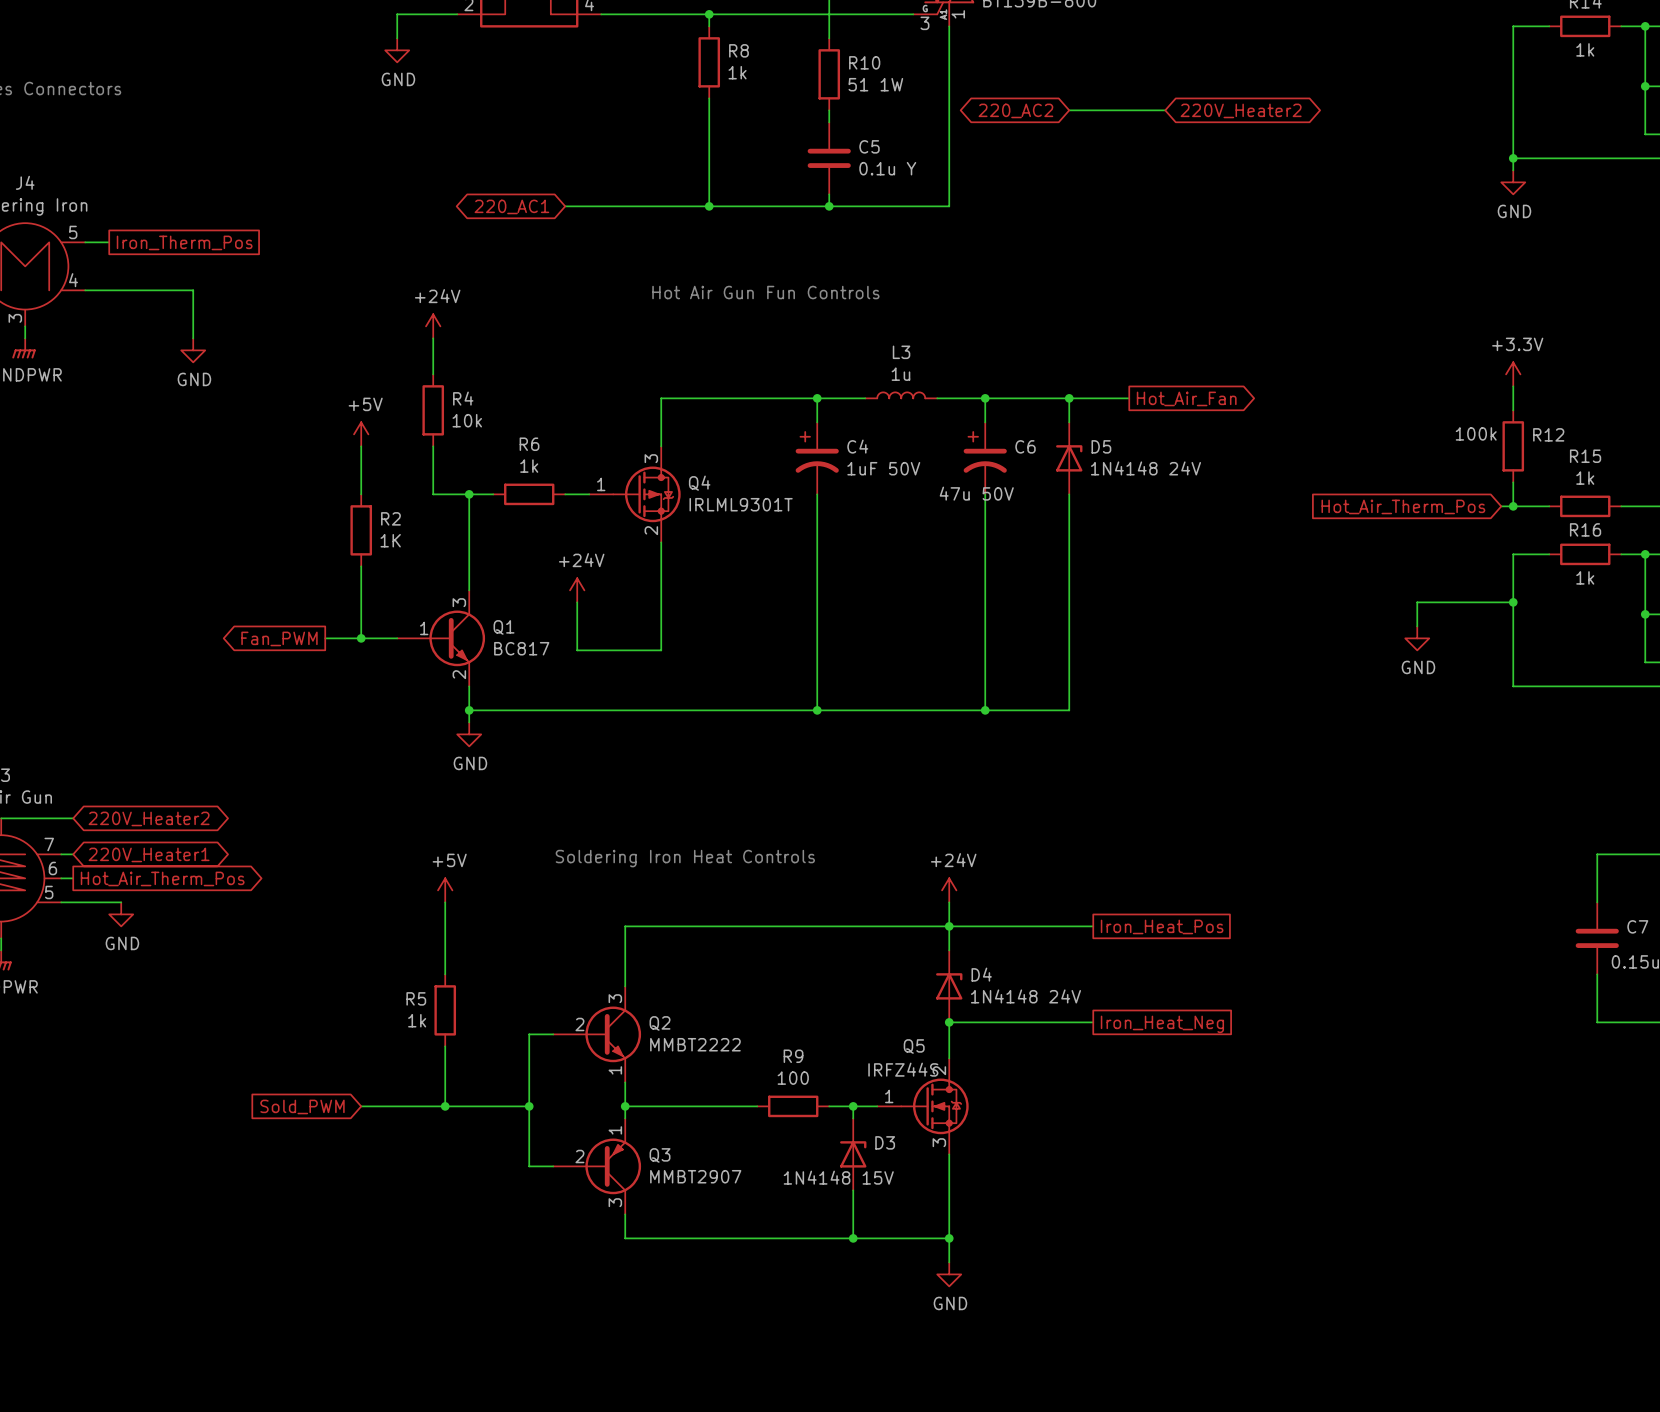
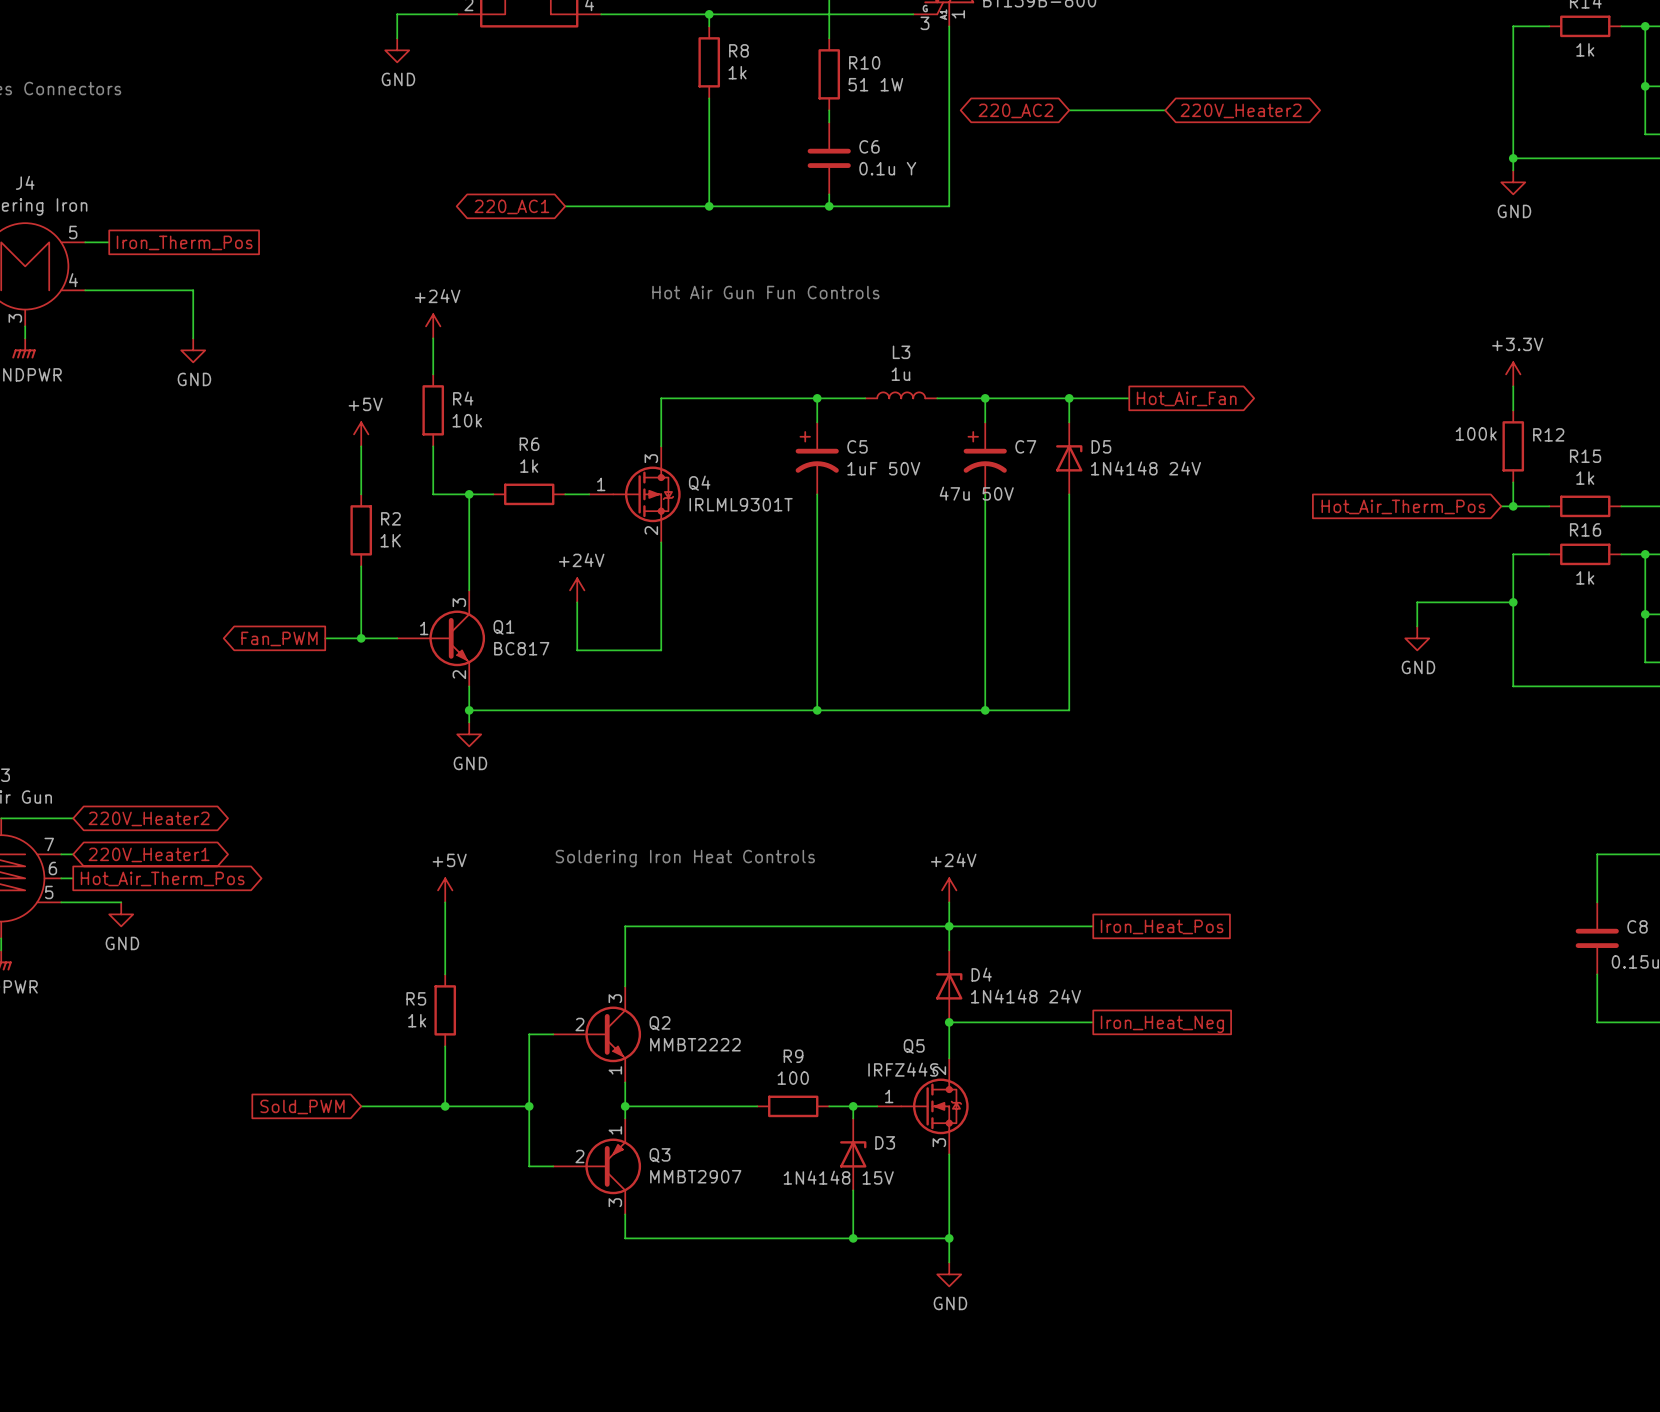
C5 name: C5 (869, 146) -> C6 (869, 146)
C4 name: C4 (857, 446) -> C5 (857, 446)
C6 name: C6 (1025, 446) -> C7 (1025, 446)
C7 name: C7 (1637, 926) -> C8 (1637, 926)

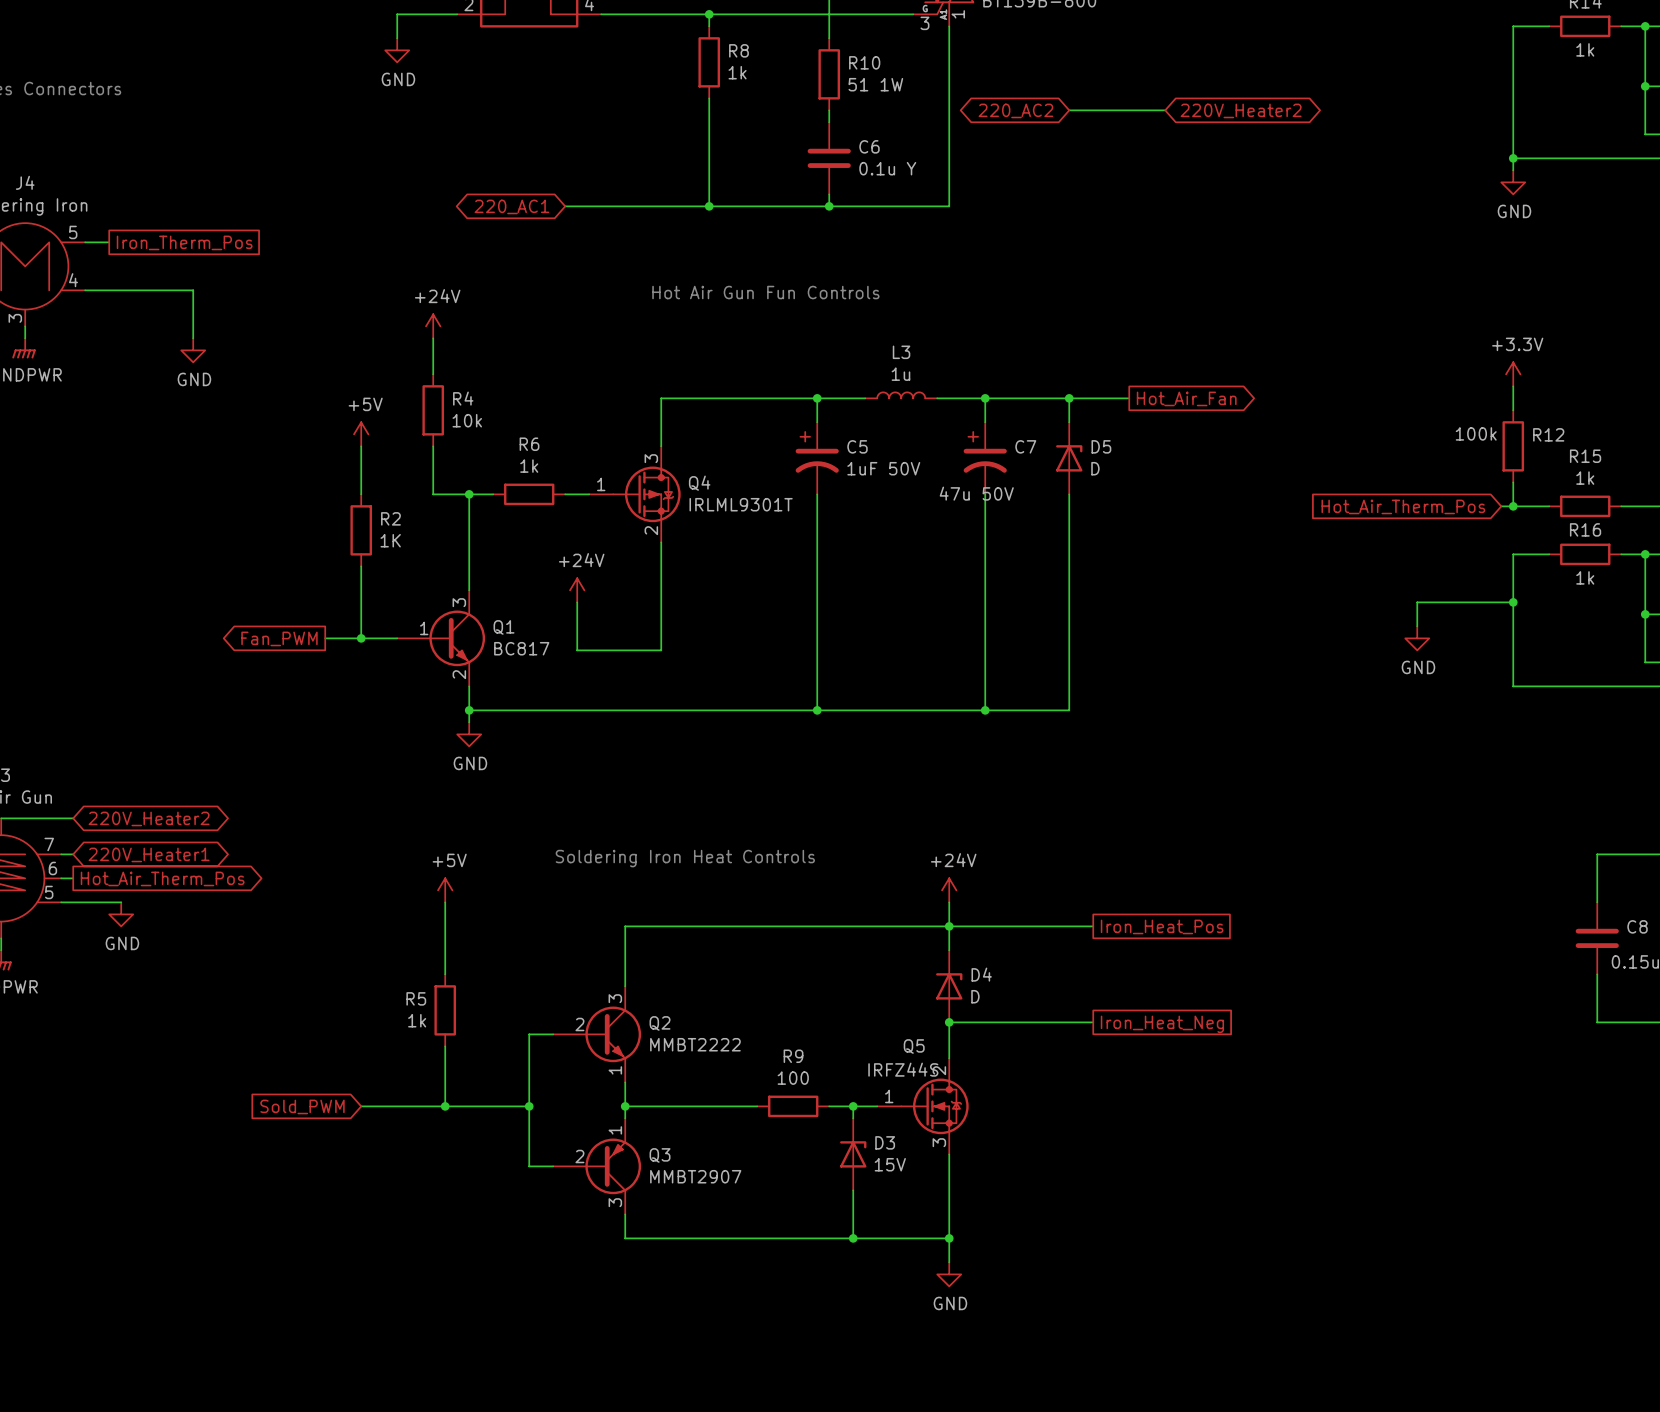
D5 value: 1N4148 24V (1145, 468) -> D (1095, 468)
D4 value: 1N4148 24V (1025, 996) -> D (975, 996)
D3 value: 1N4148 15V (838, 1177) -> 15V (890, 1164)

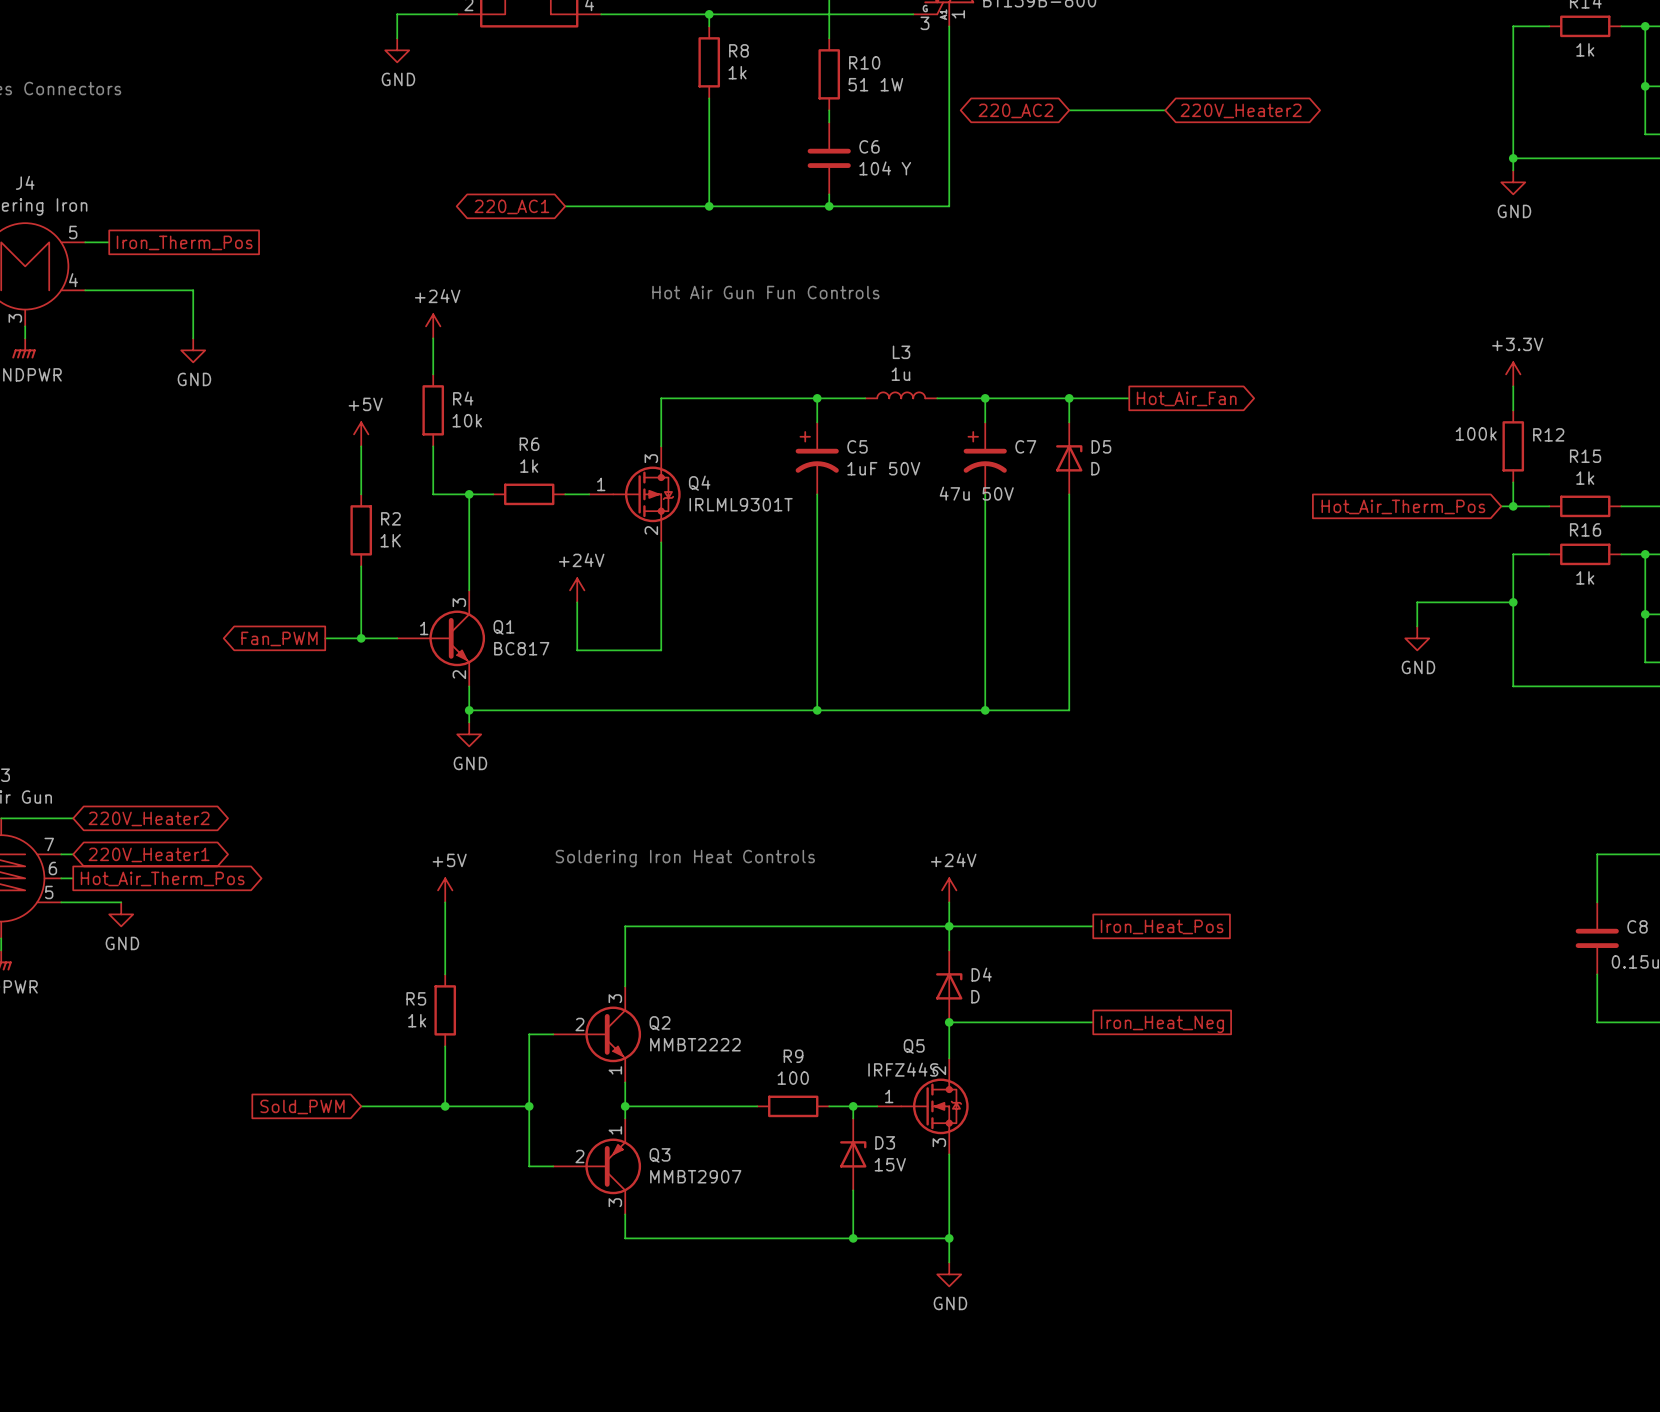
C6 value: 0.1u Y (887, 168) -> 104 Y (885, 168)

